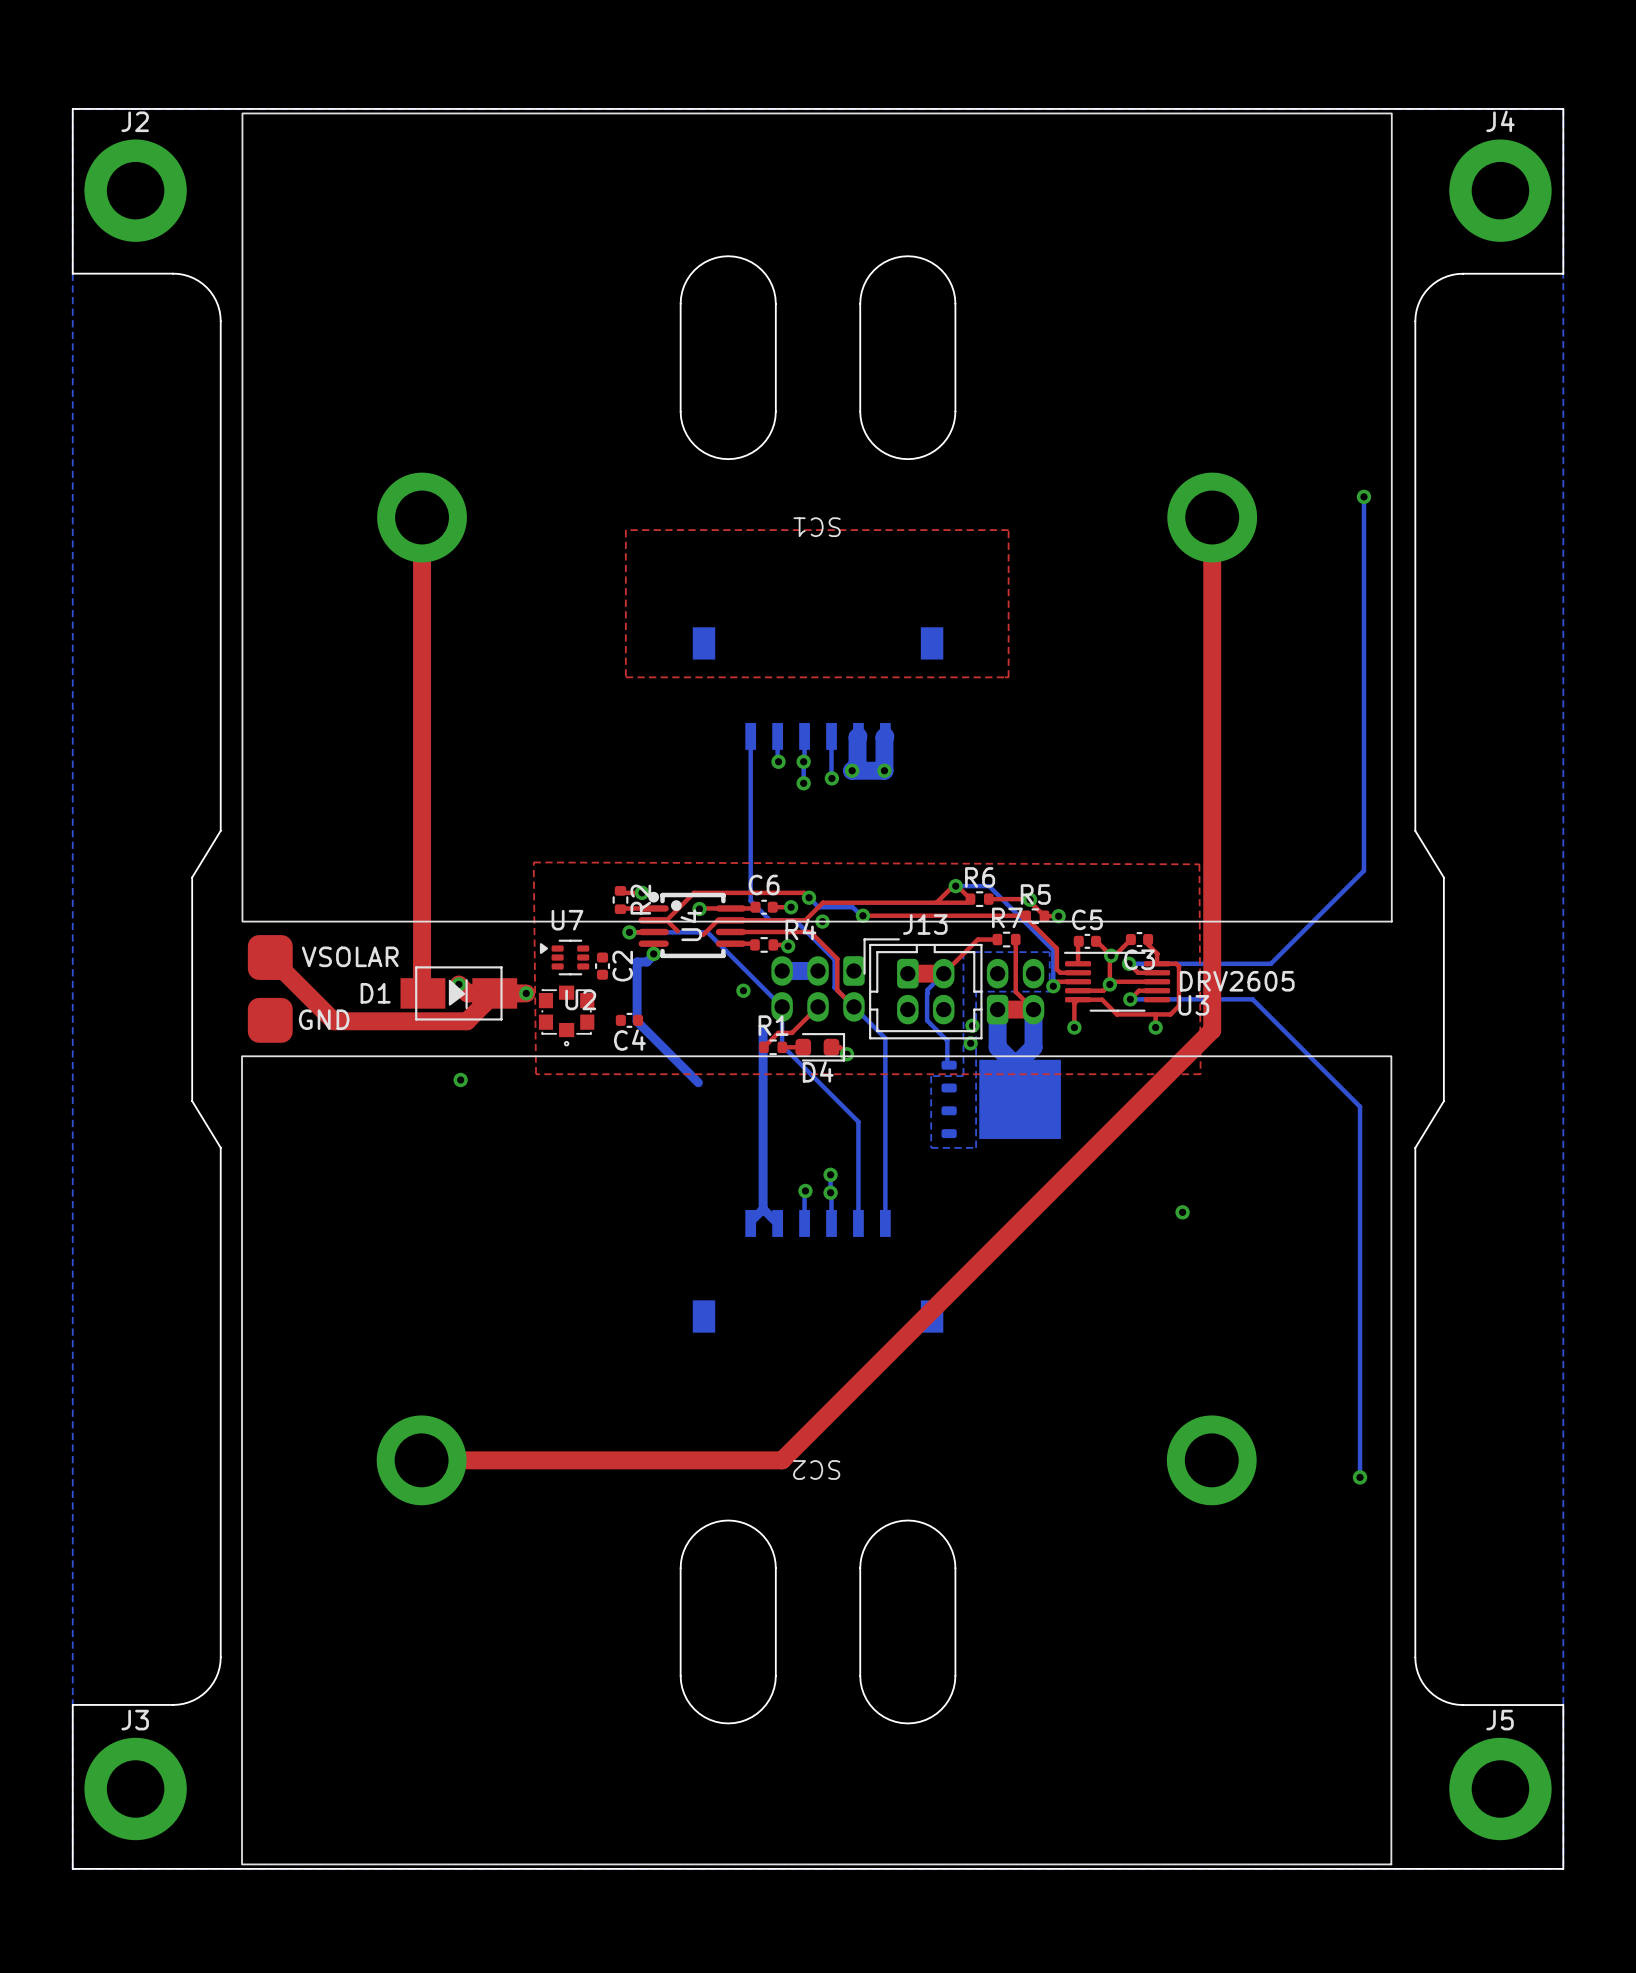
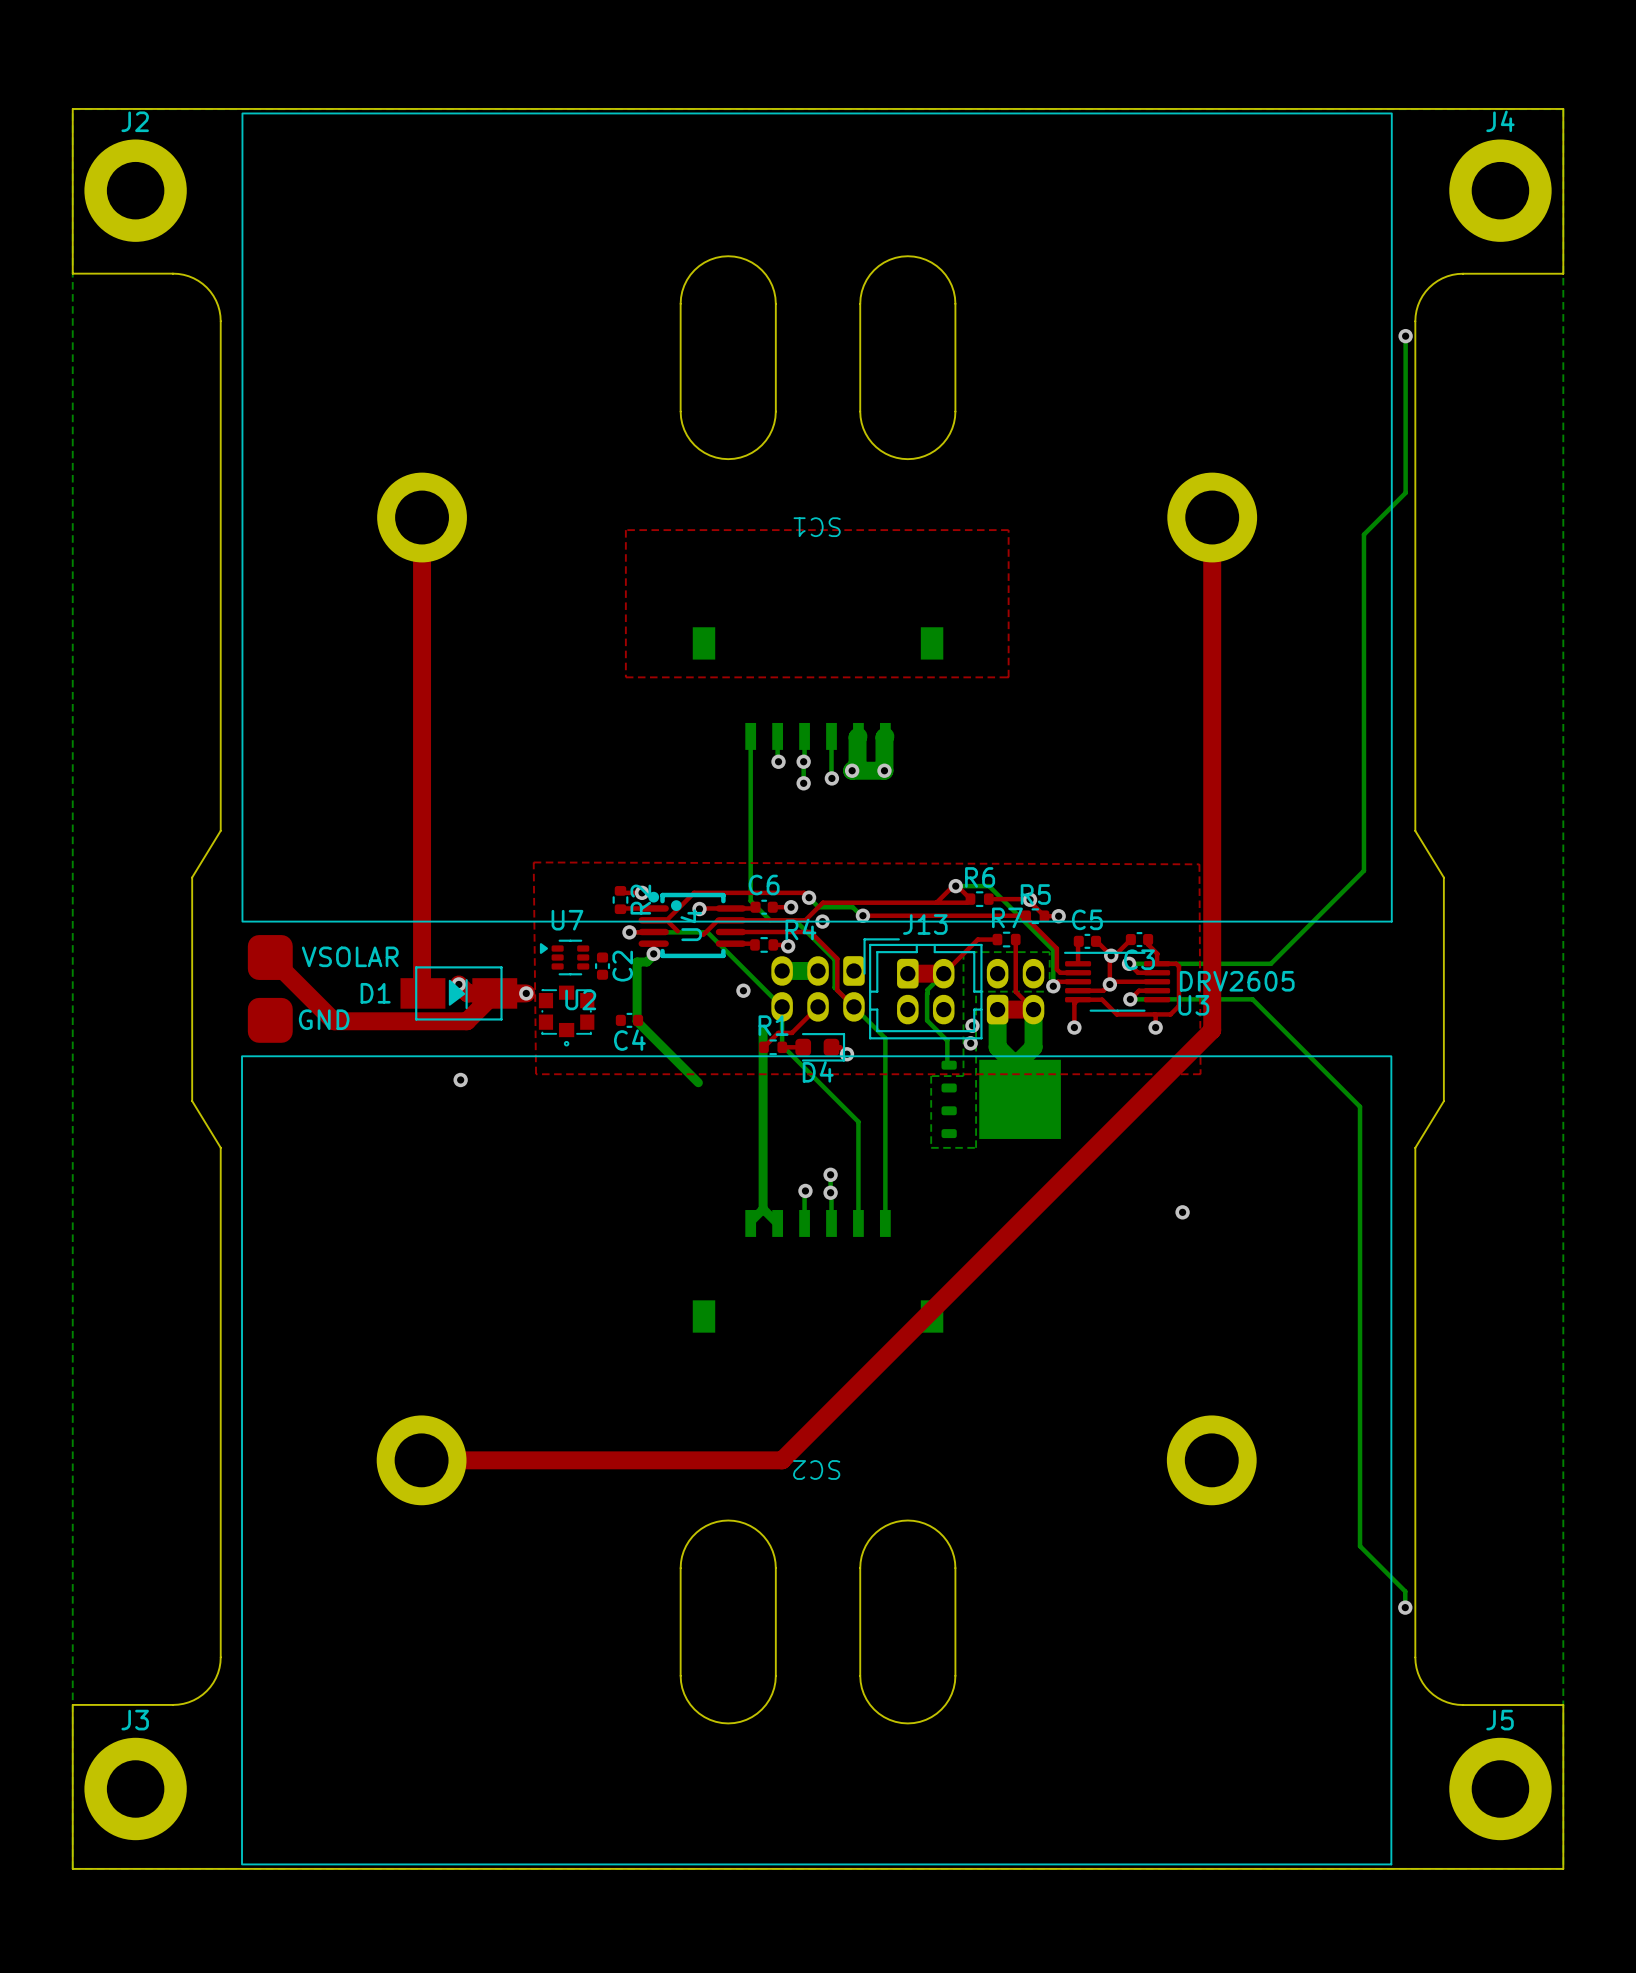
via: none -> (1405, 336)
bottom track: (1363, 496) (1363, 534) -> (1405, 336) (1405, 492) (1363, 534)
via: (1363, 496) -> none
bottom track: none -> (1360, 1477) (1360, 1546) (1405, 1591) (1405, 1607)
via: (1360, 1477) -> none
via: none -> (1405, 1607)

